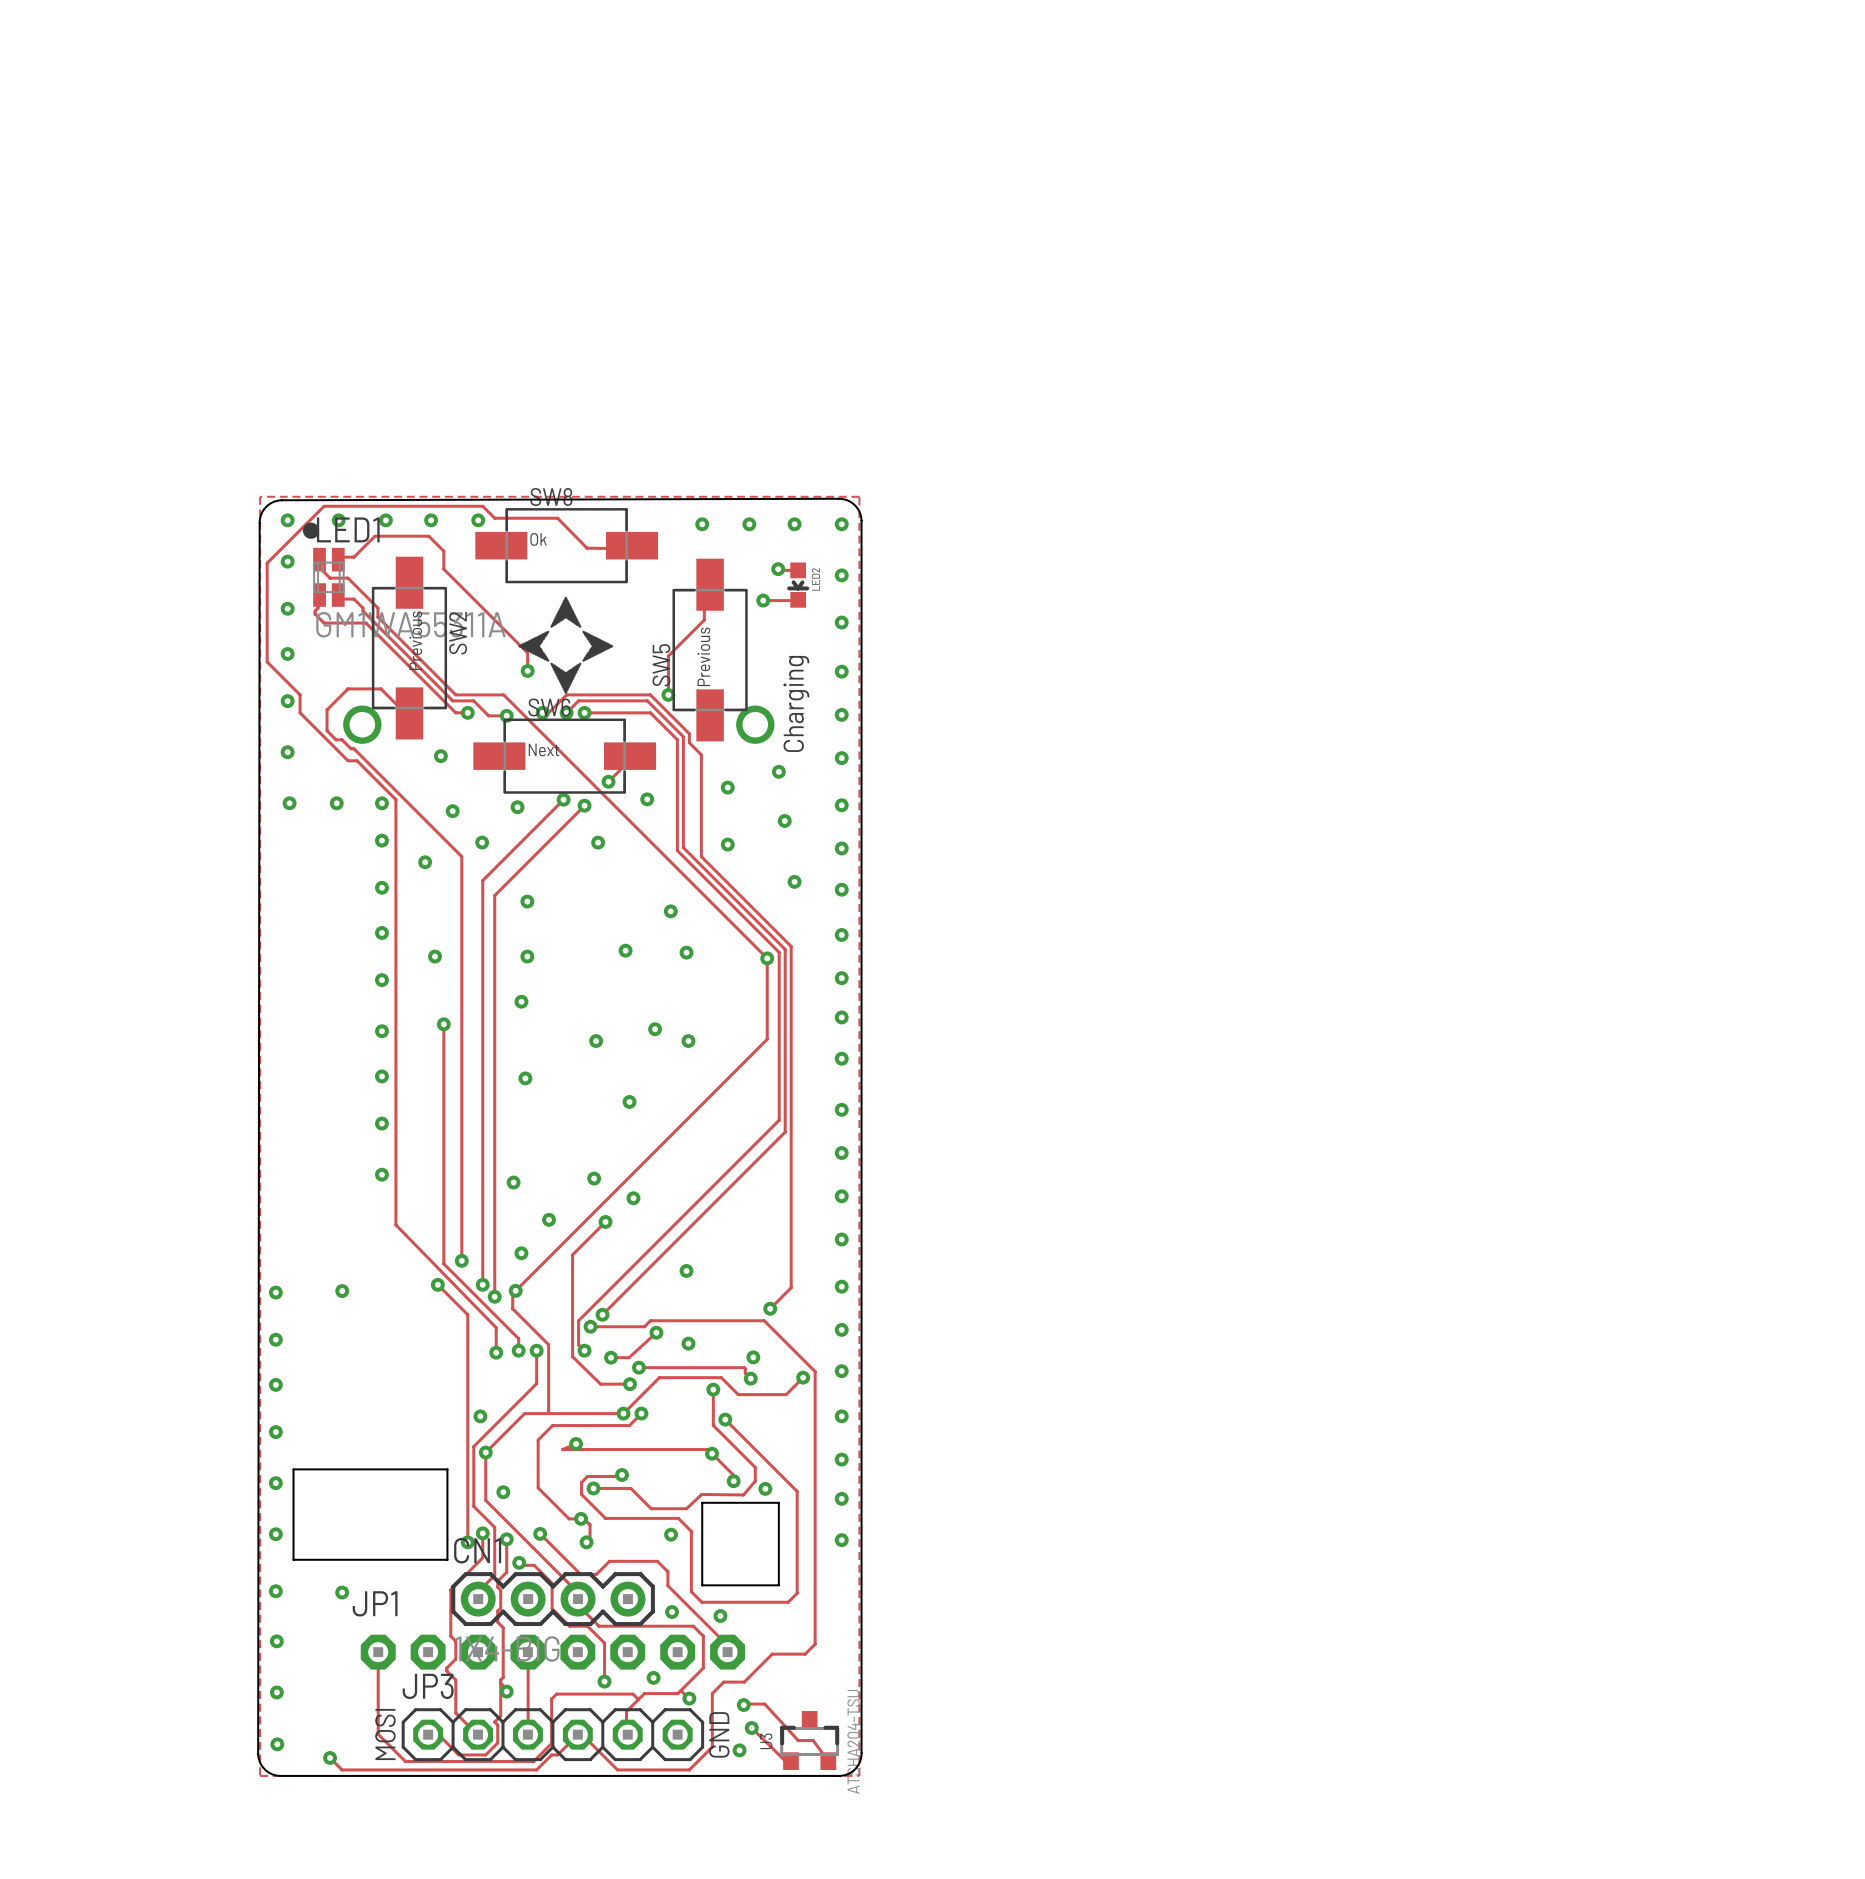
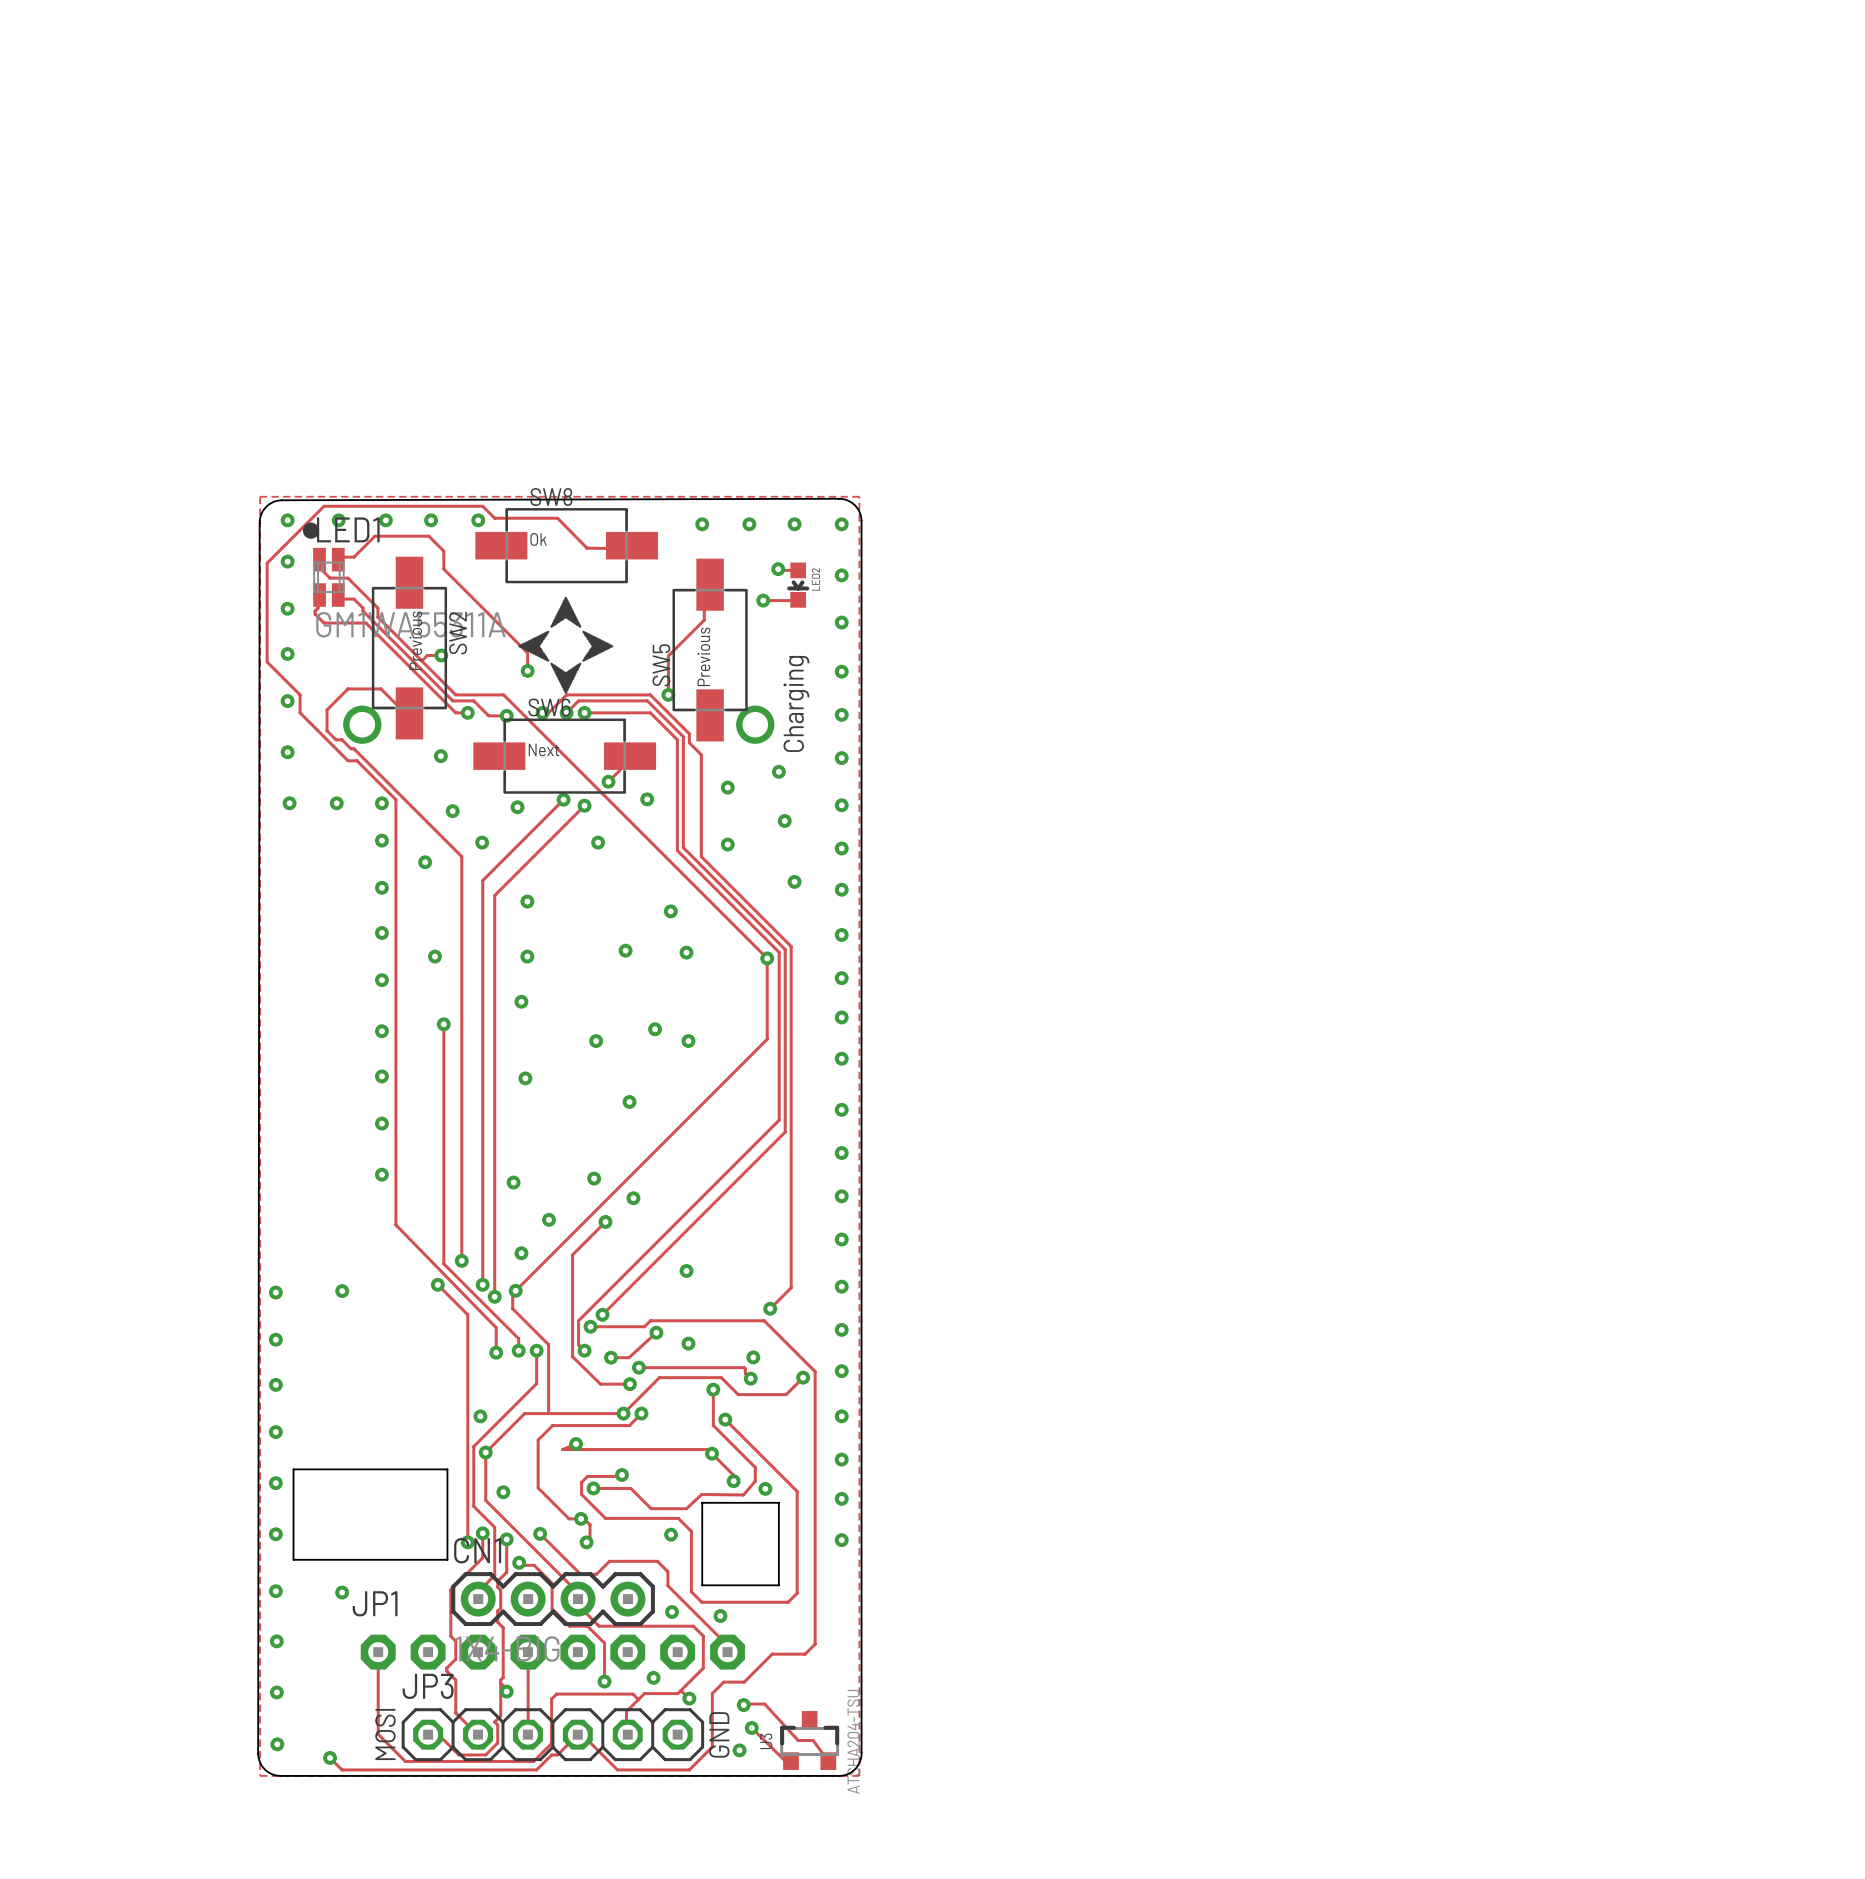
track: none -> (441, 655) (427, 655) (421, 660)
via: none -> (441, 655)

